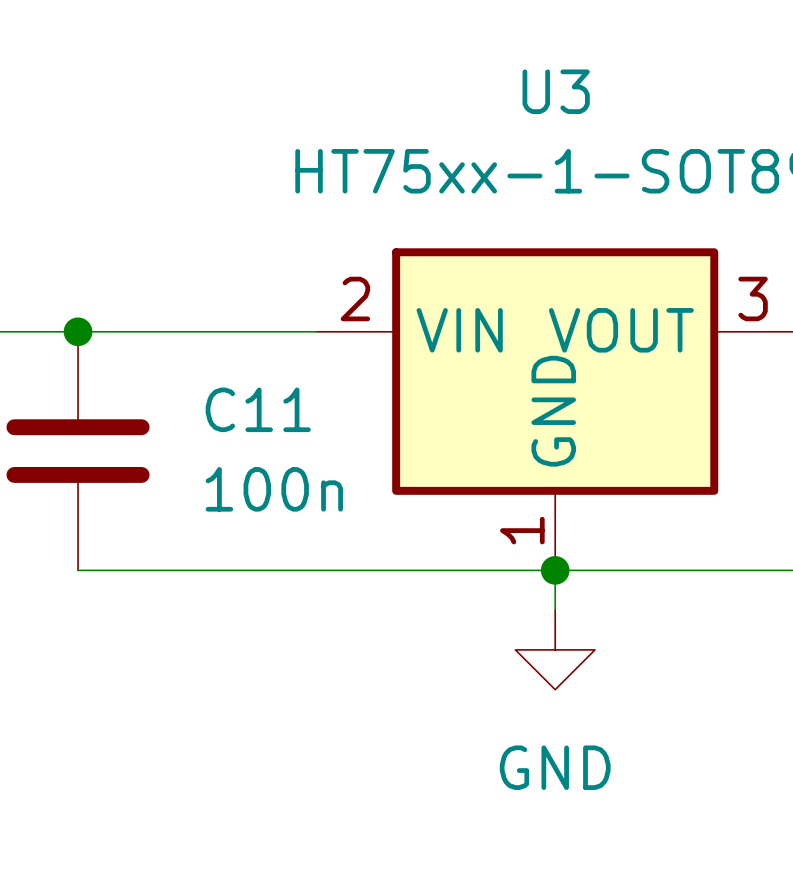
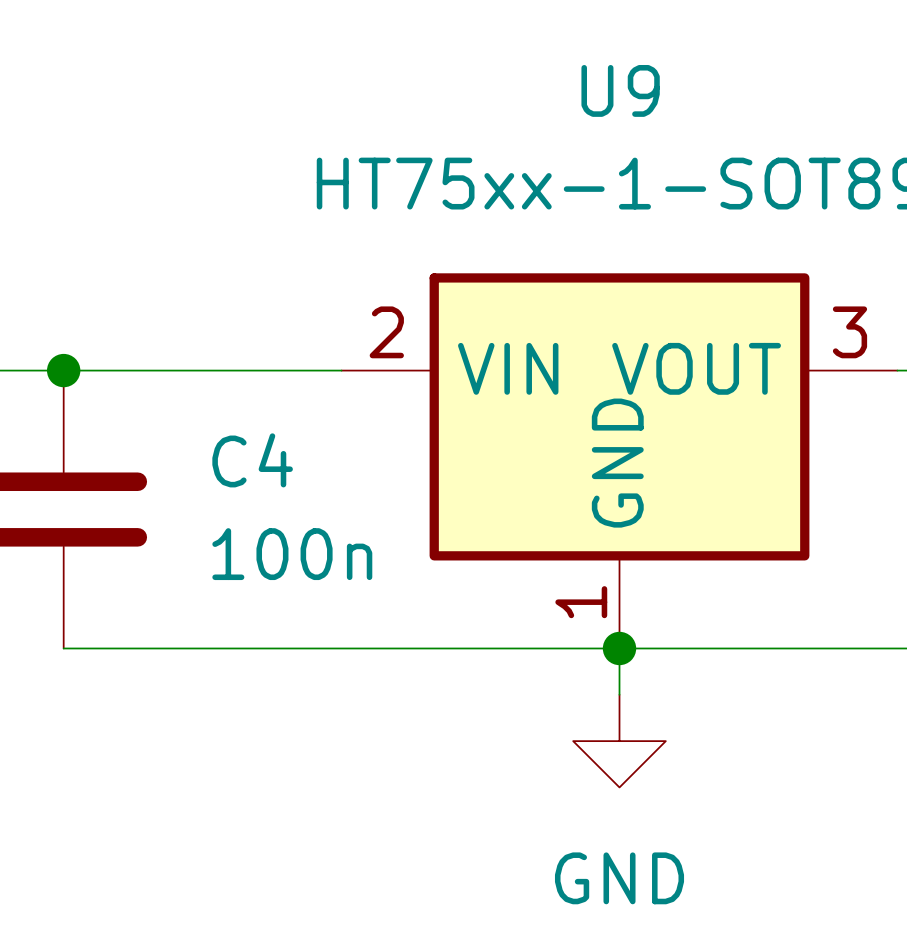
U3 name: U3 (556, 91) -> U9 (620, 90)
C11 name: C11 (258, 409) -> C4 (252, 460)

